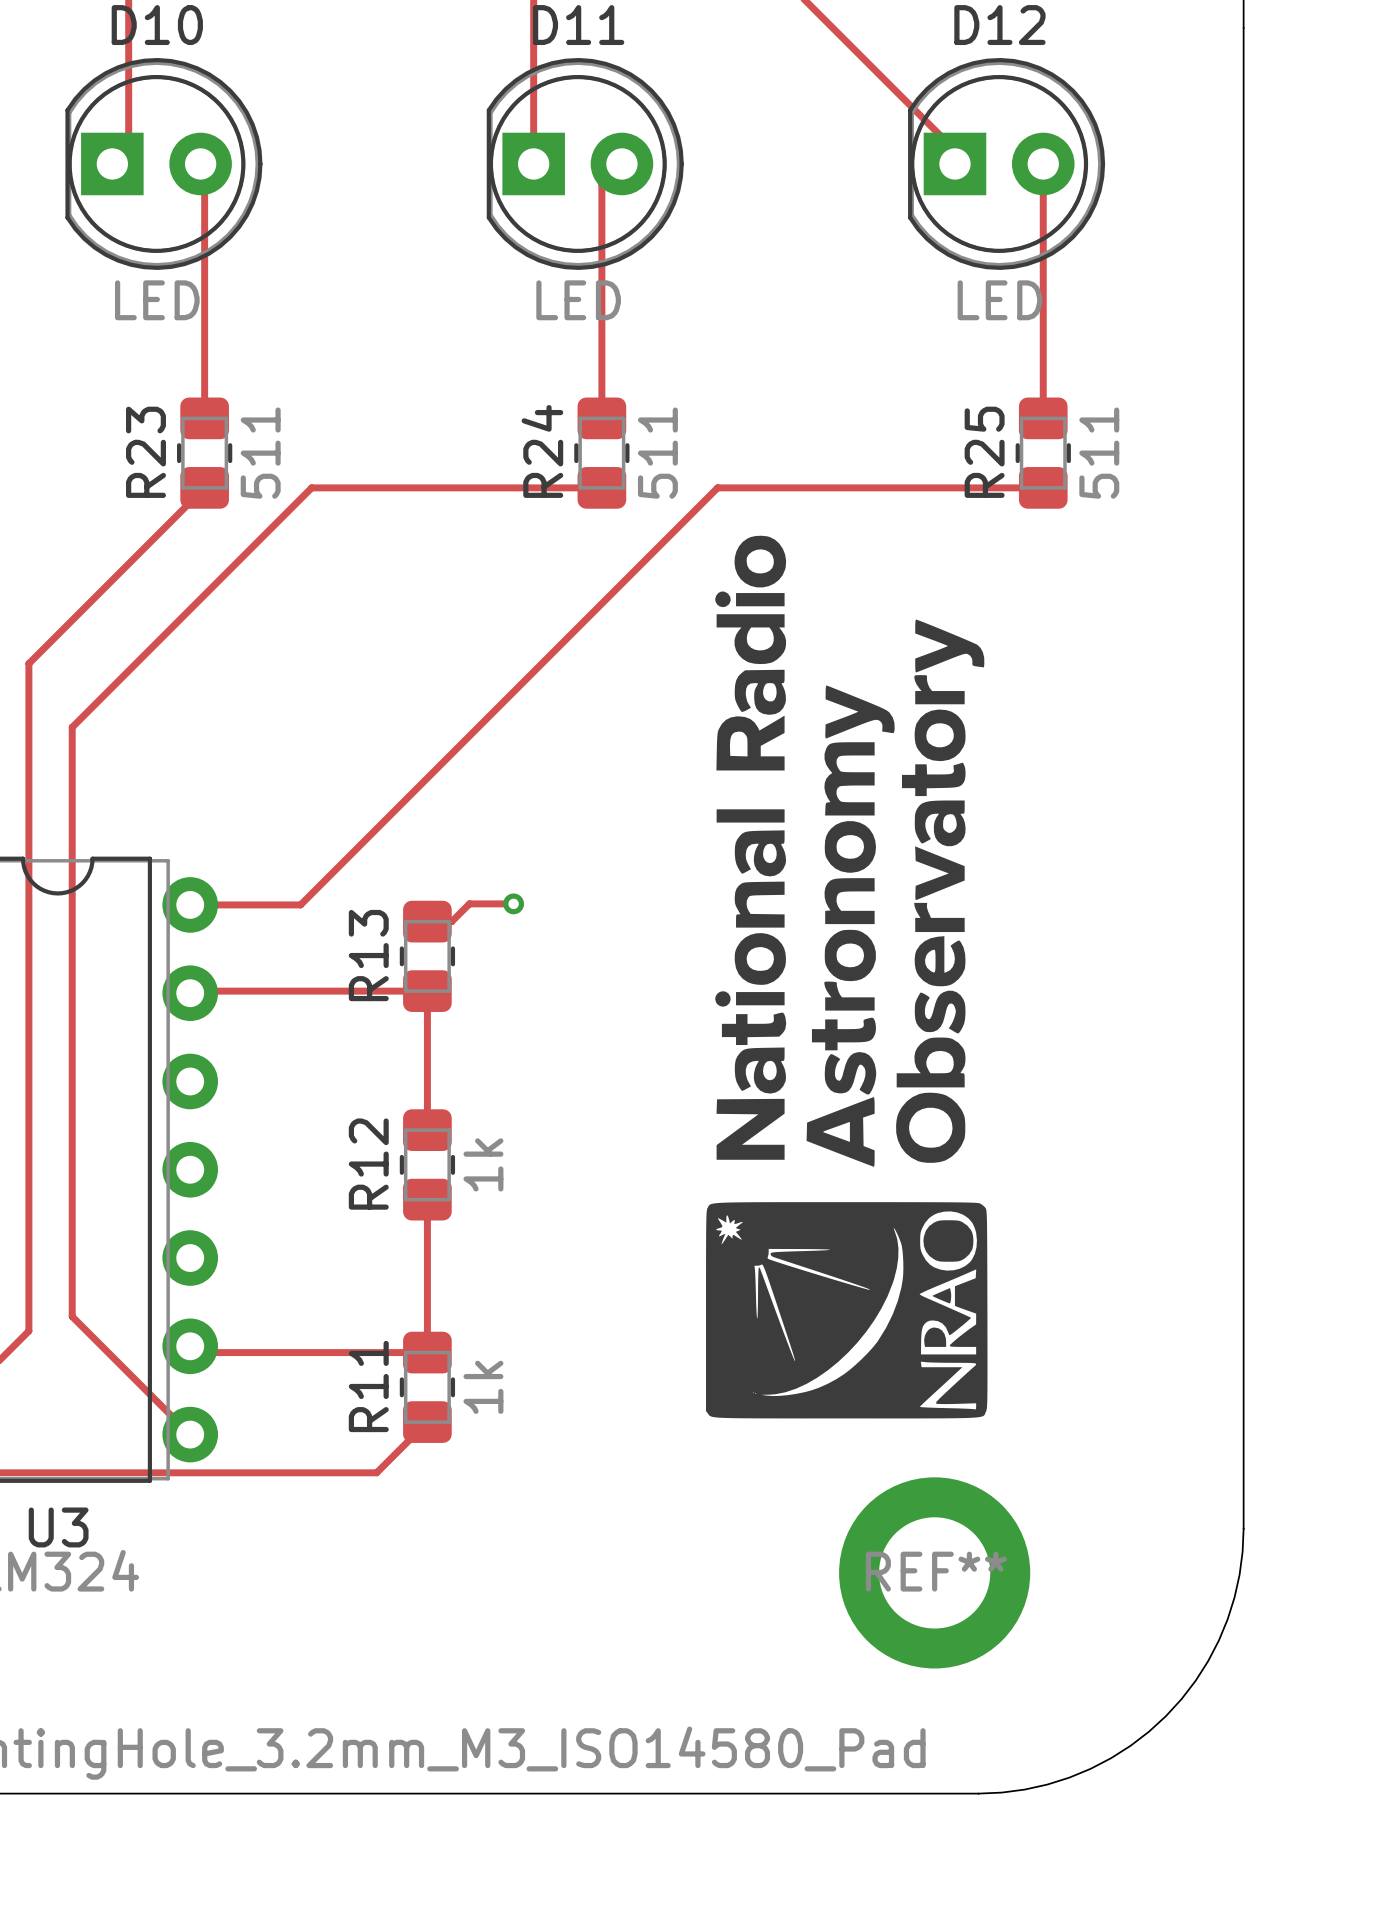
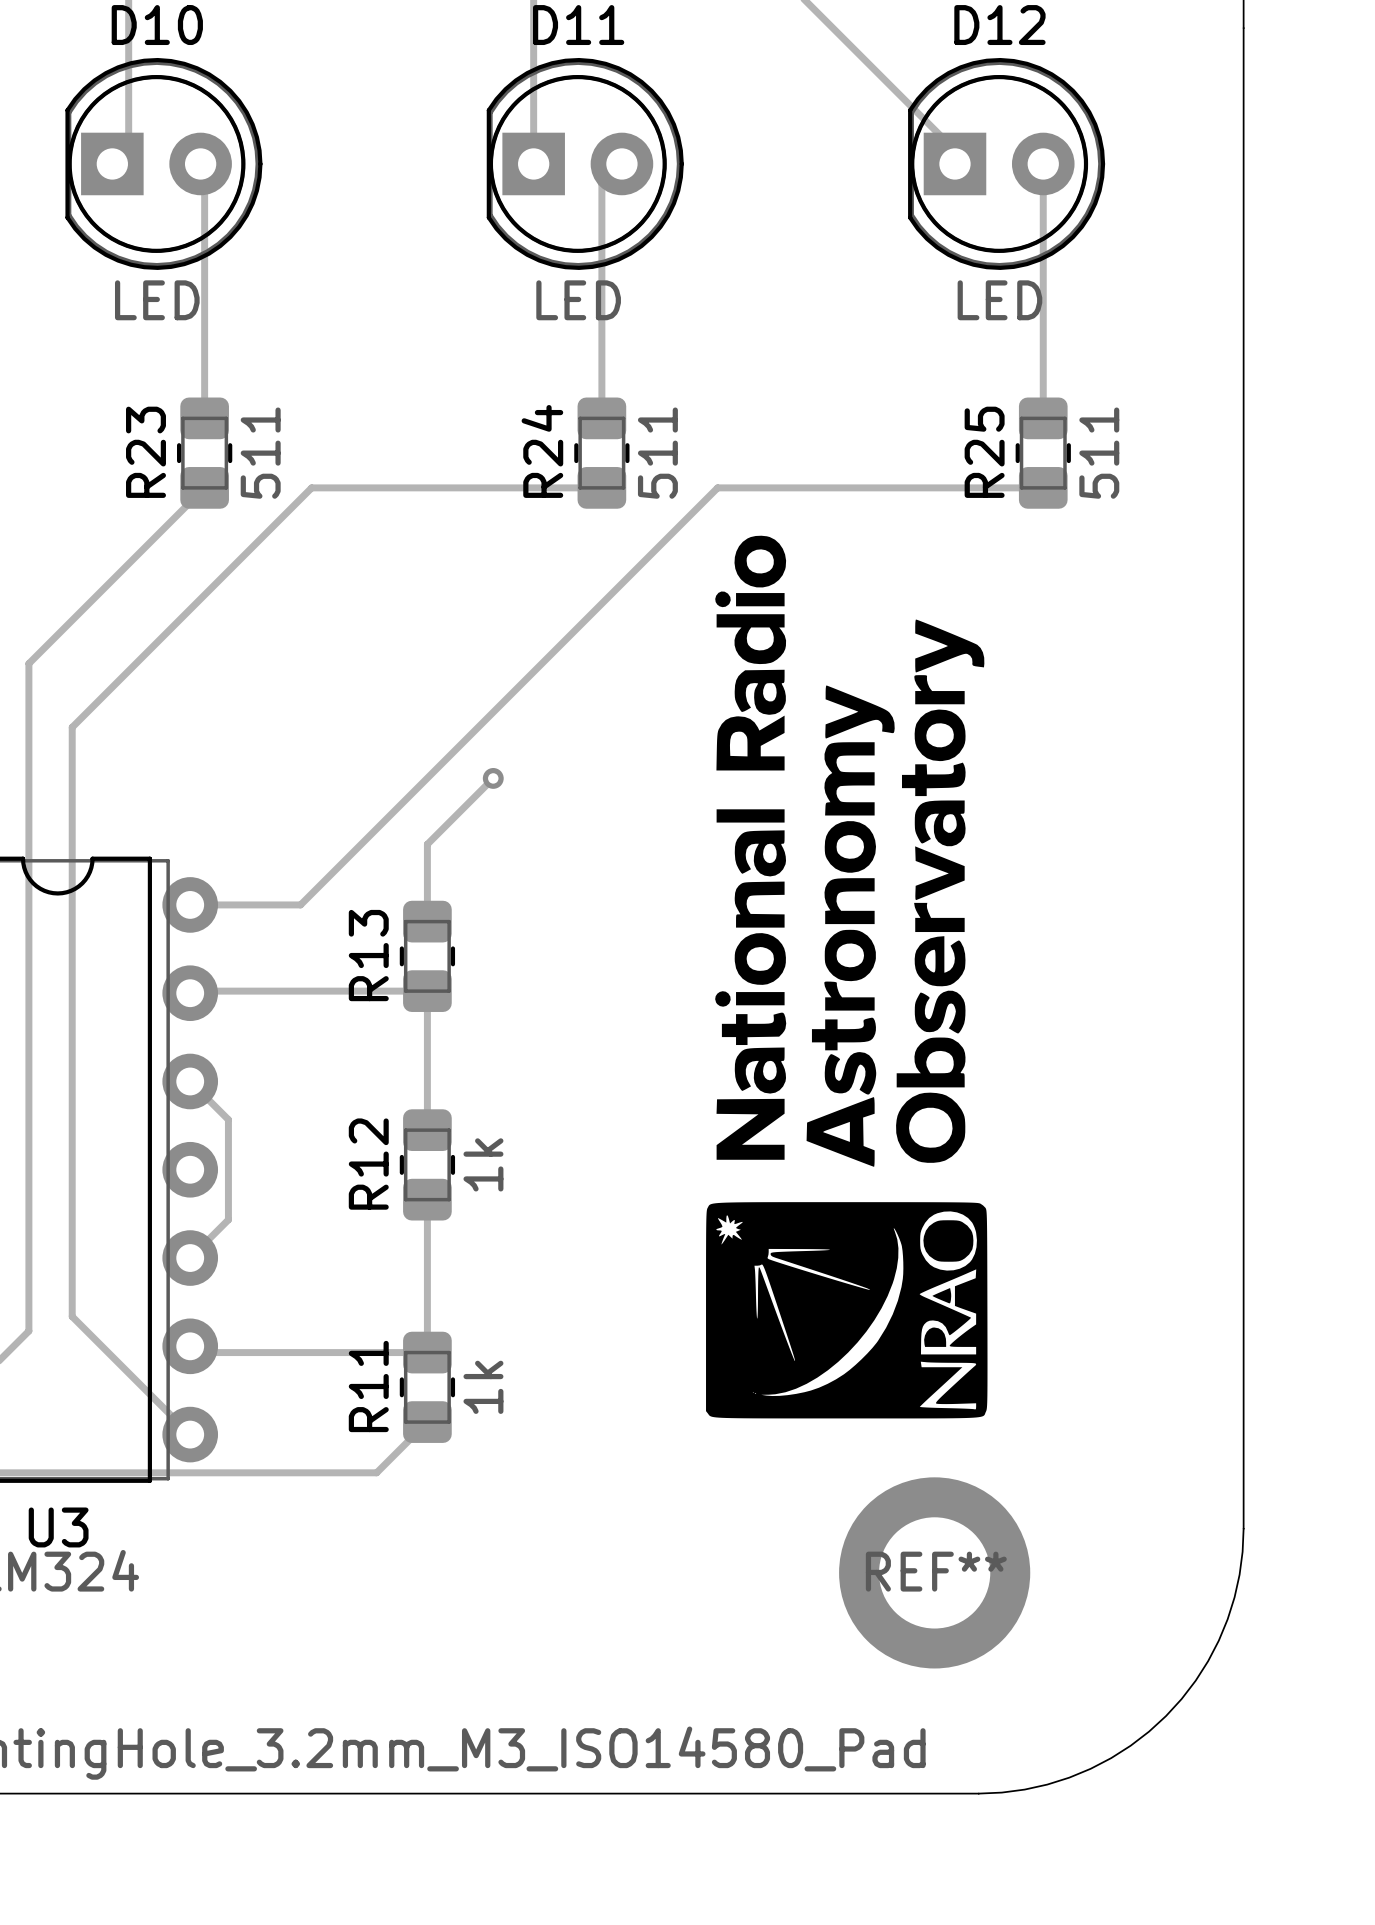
track: (513, 903) (469, 903) (451, 921) (427, 921) -> (493, 778) (427, 844) (427, 921)
via position: (513, 903) -> (493, 778)
track: none -> (190, 1081) (228, 1119) (228, 1219) (190, 1258)

